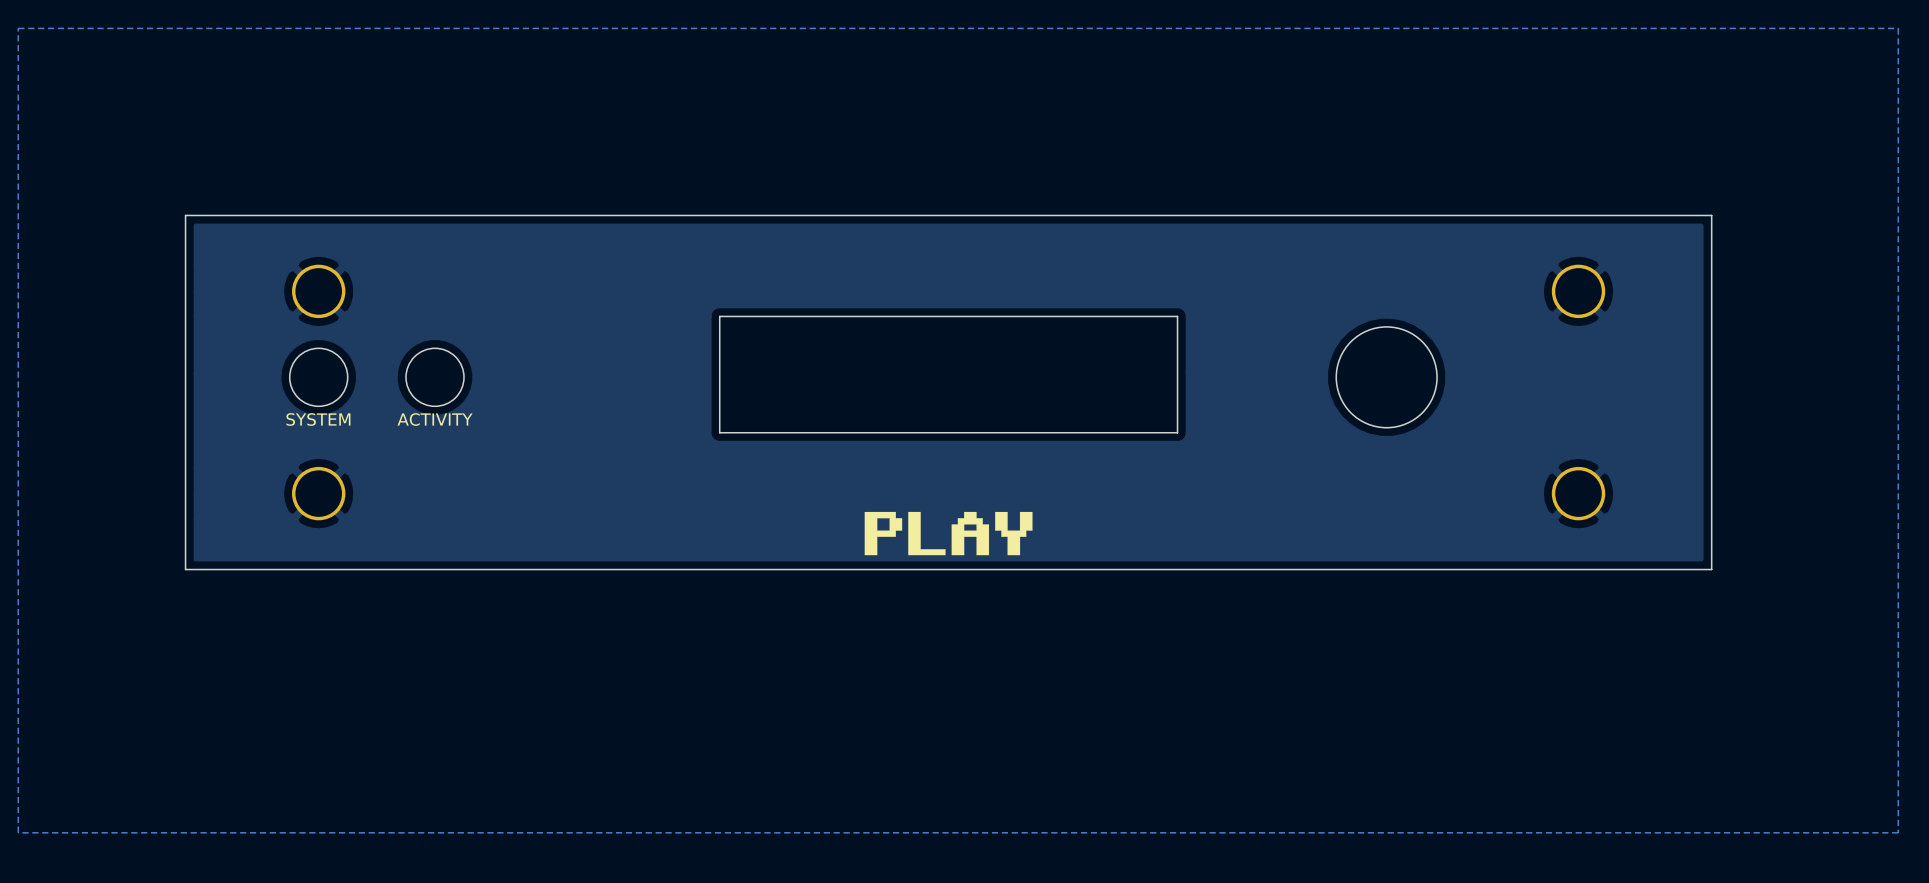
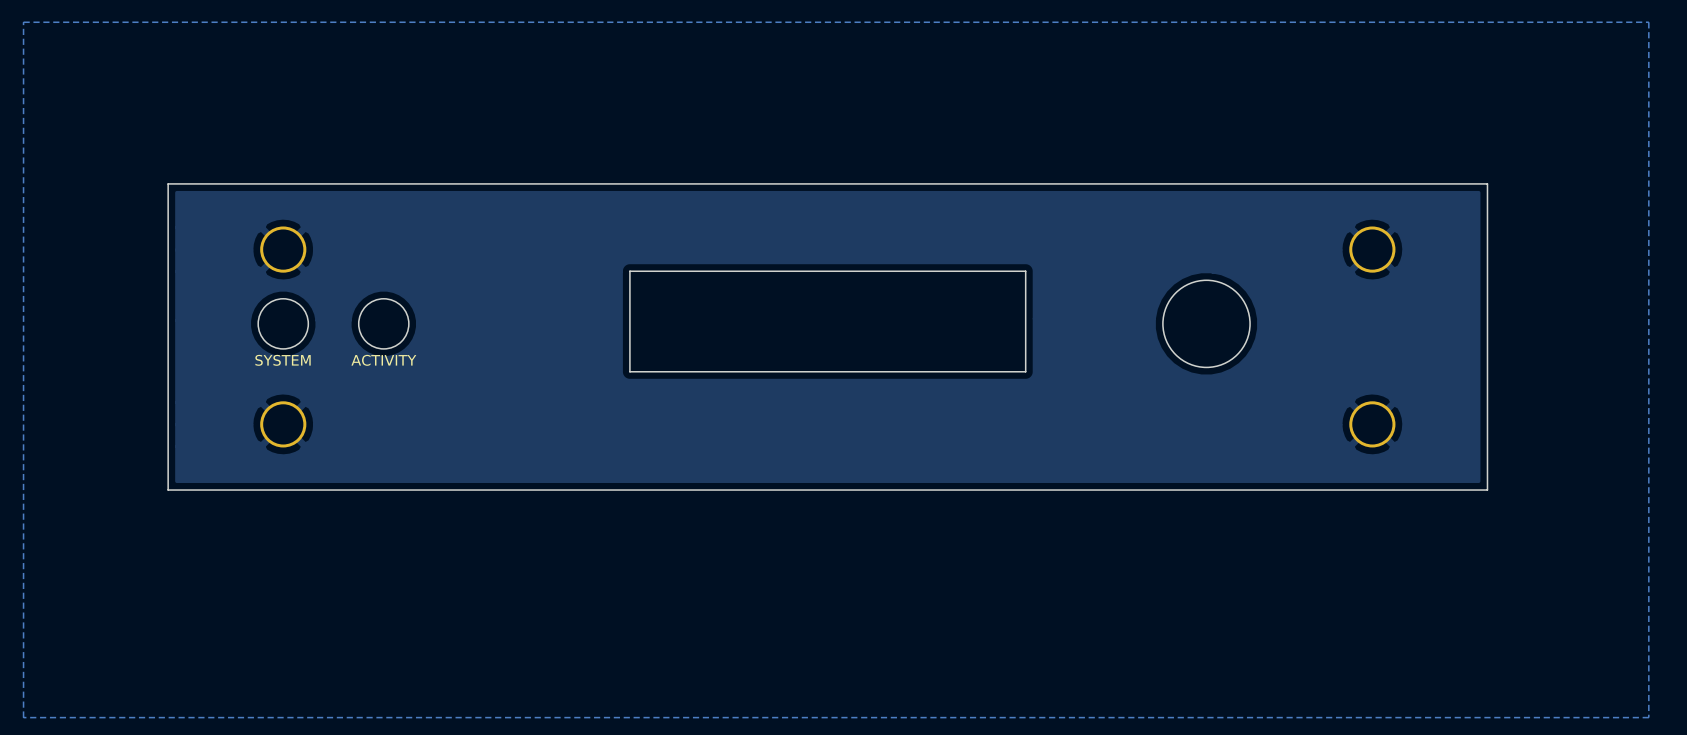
drawing: [864, 511, 1033, 556] -> none

